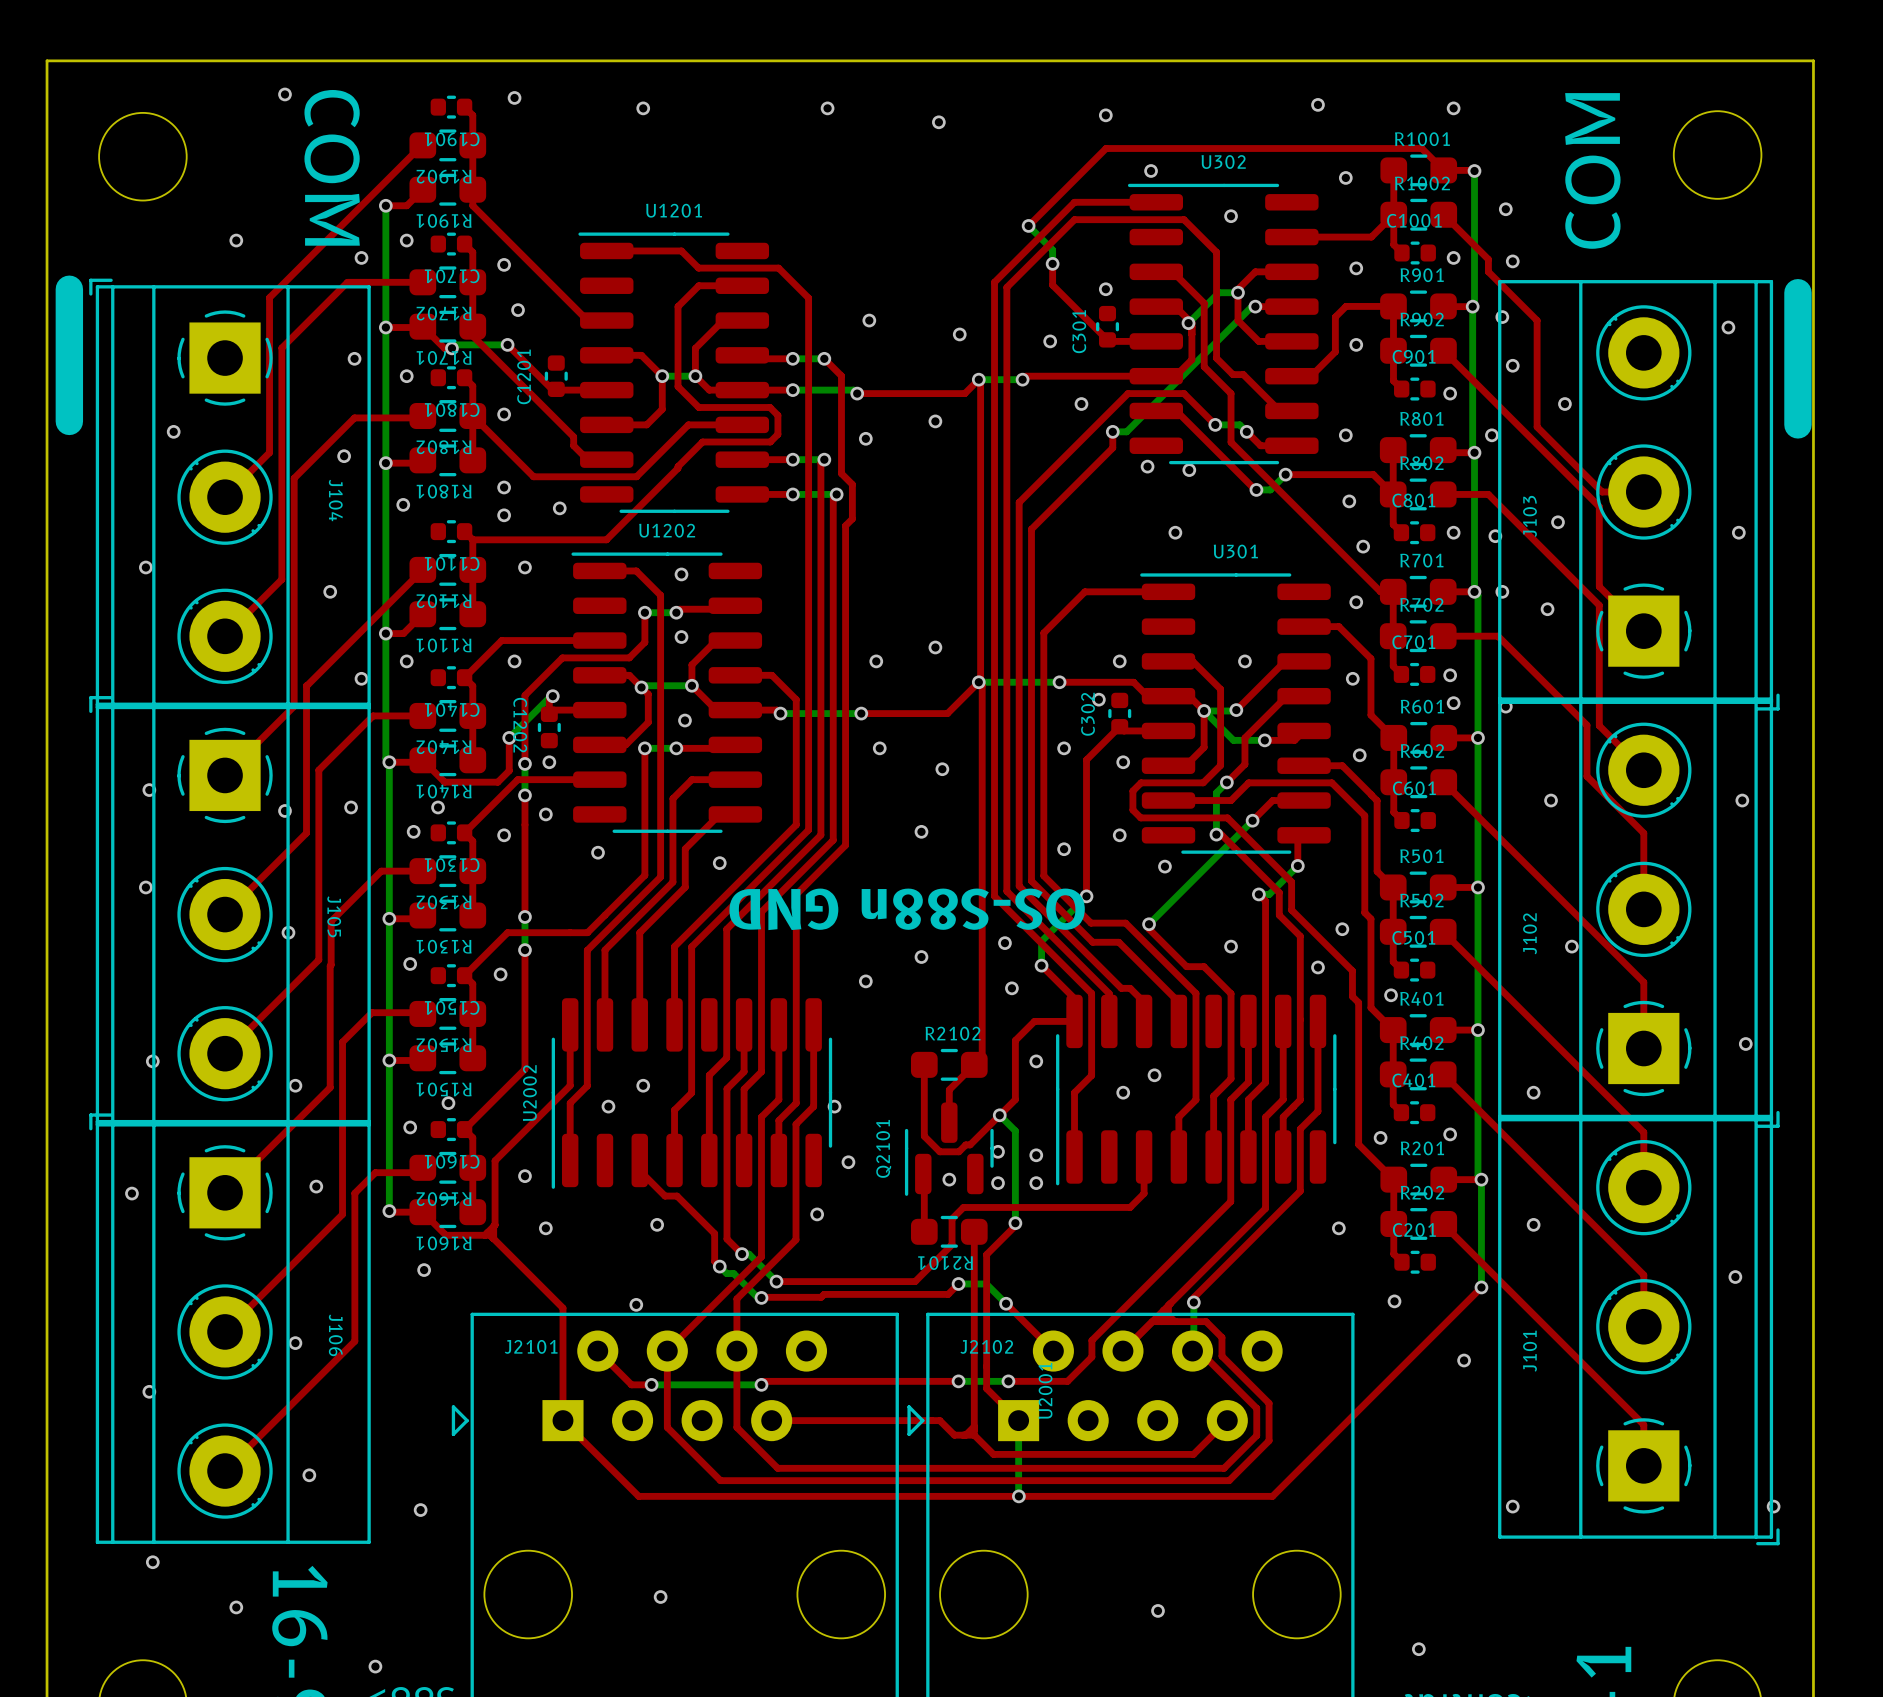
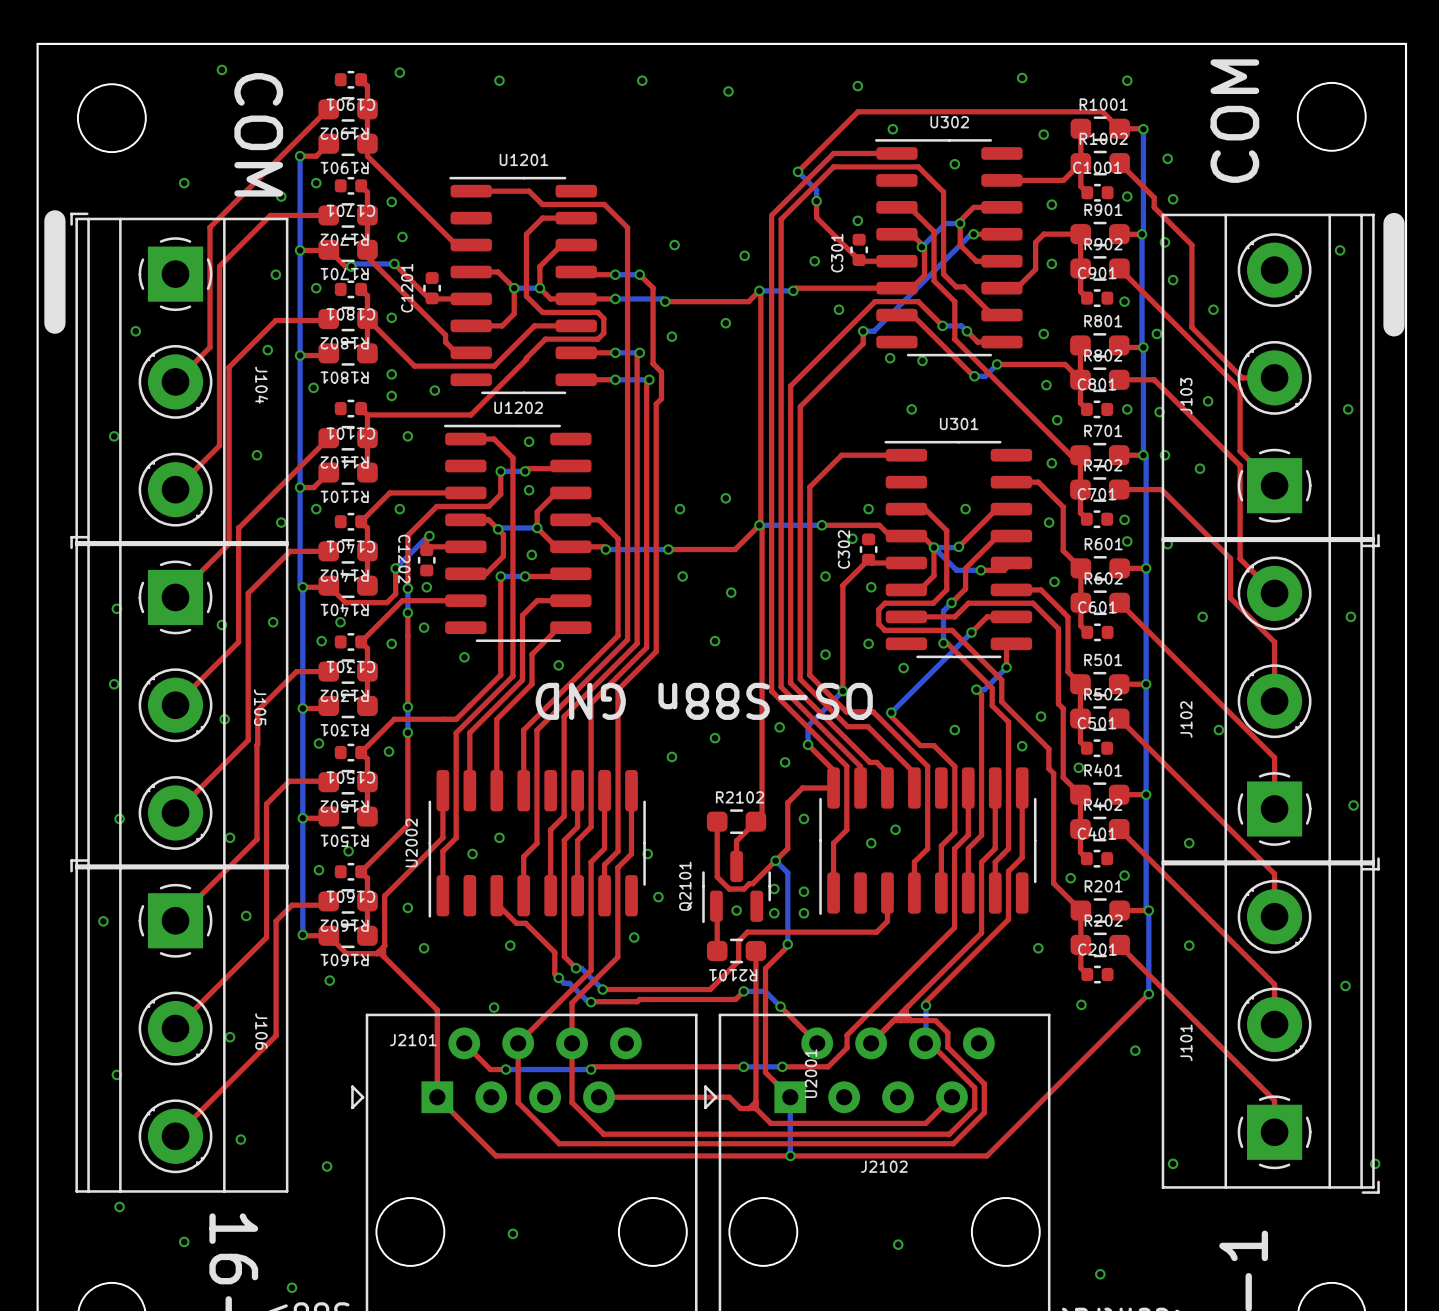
J2102 name position: J2102 (986, 1346) -> J2102 (884, 1166)

